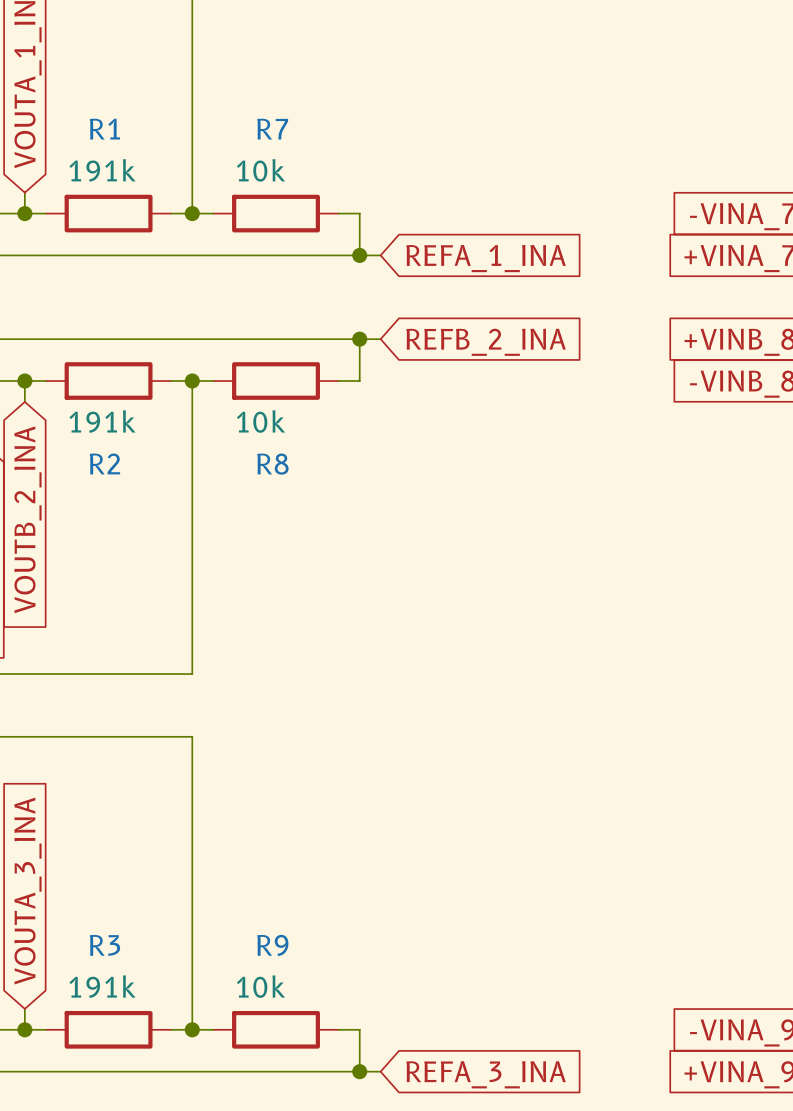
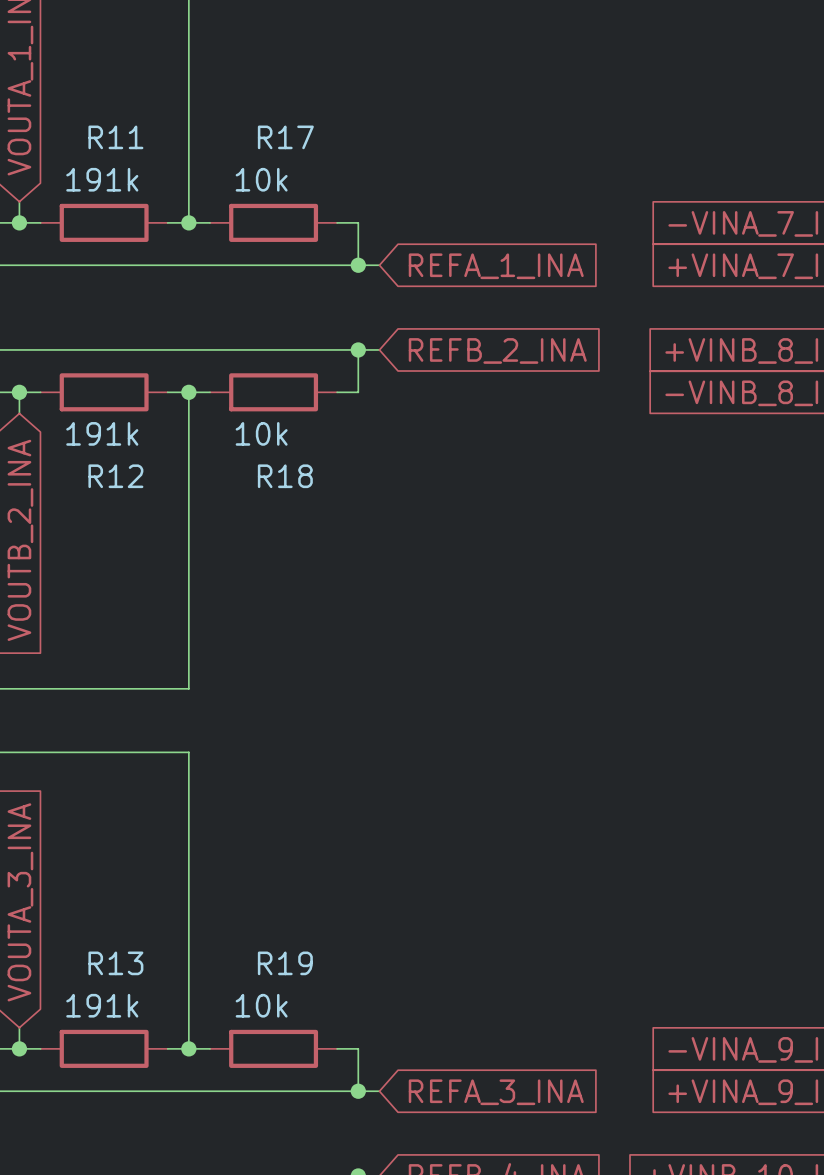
R1 name: R1 (104, 129) -> R11 (115, 137)
R7 name: R7 (272, 129) -> R17 (285, 137)
R2 name: R2 (104, 463) -> R12 (115, 476)
R8 name: R8 (272, 464) -> R18 (285, 476)
R3 name: R3 (104, 945) -> R13 (115, 963)
R9 name: R9 (272, 945) -> R19 (285, 963)

